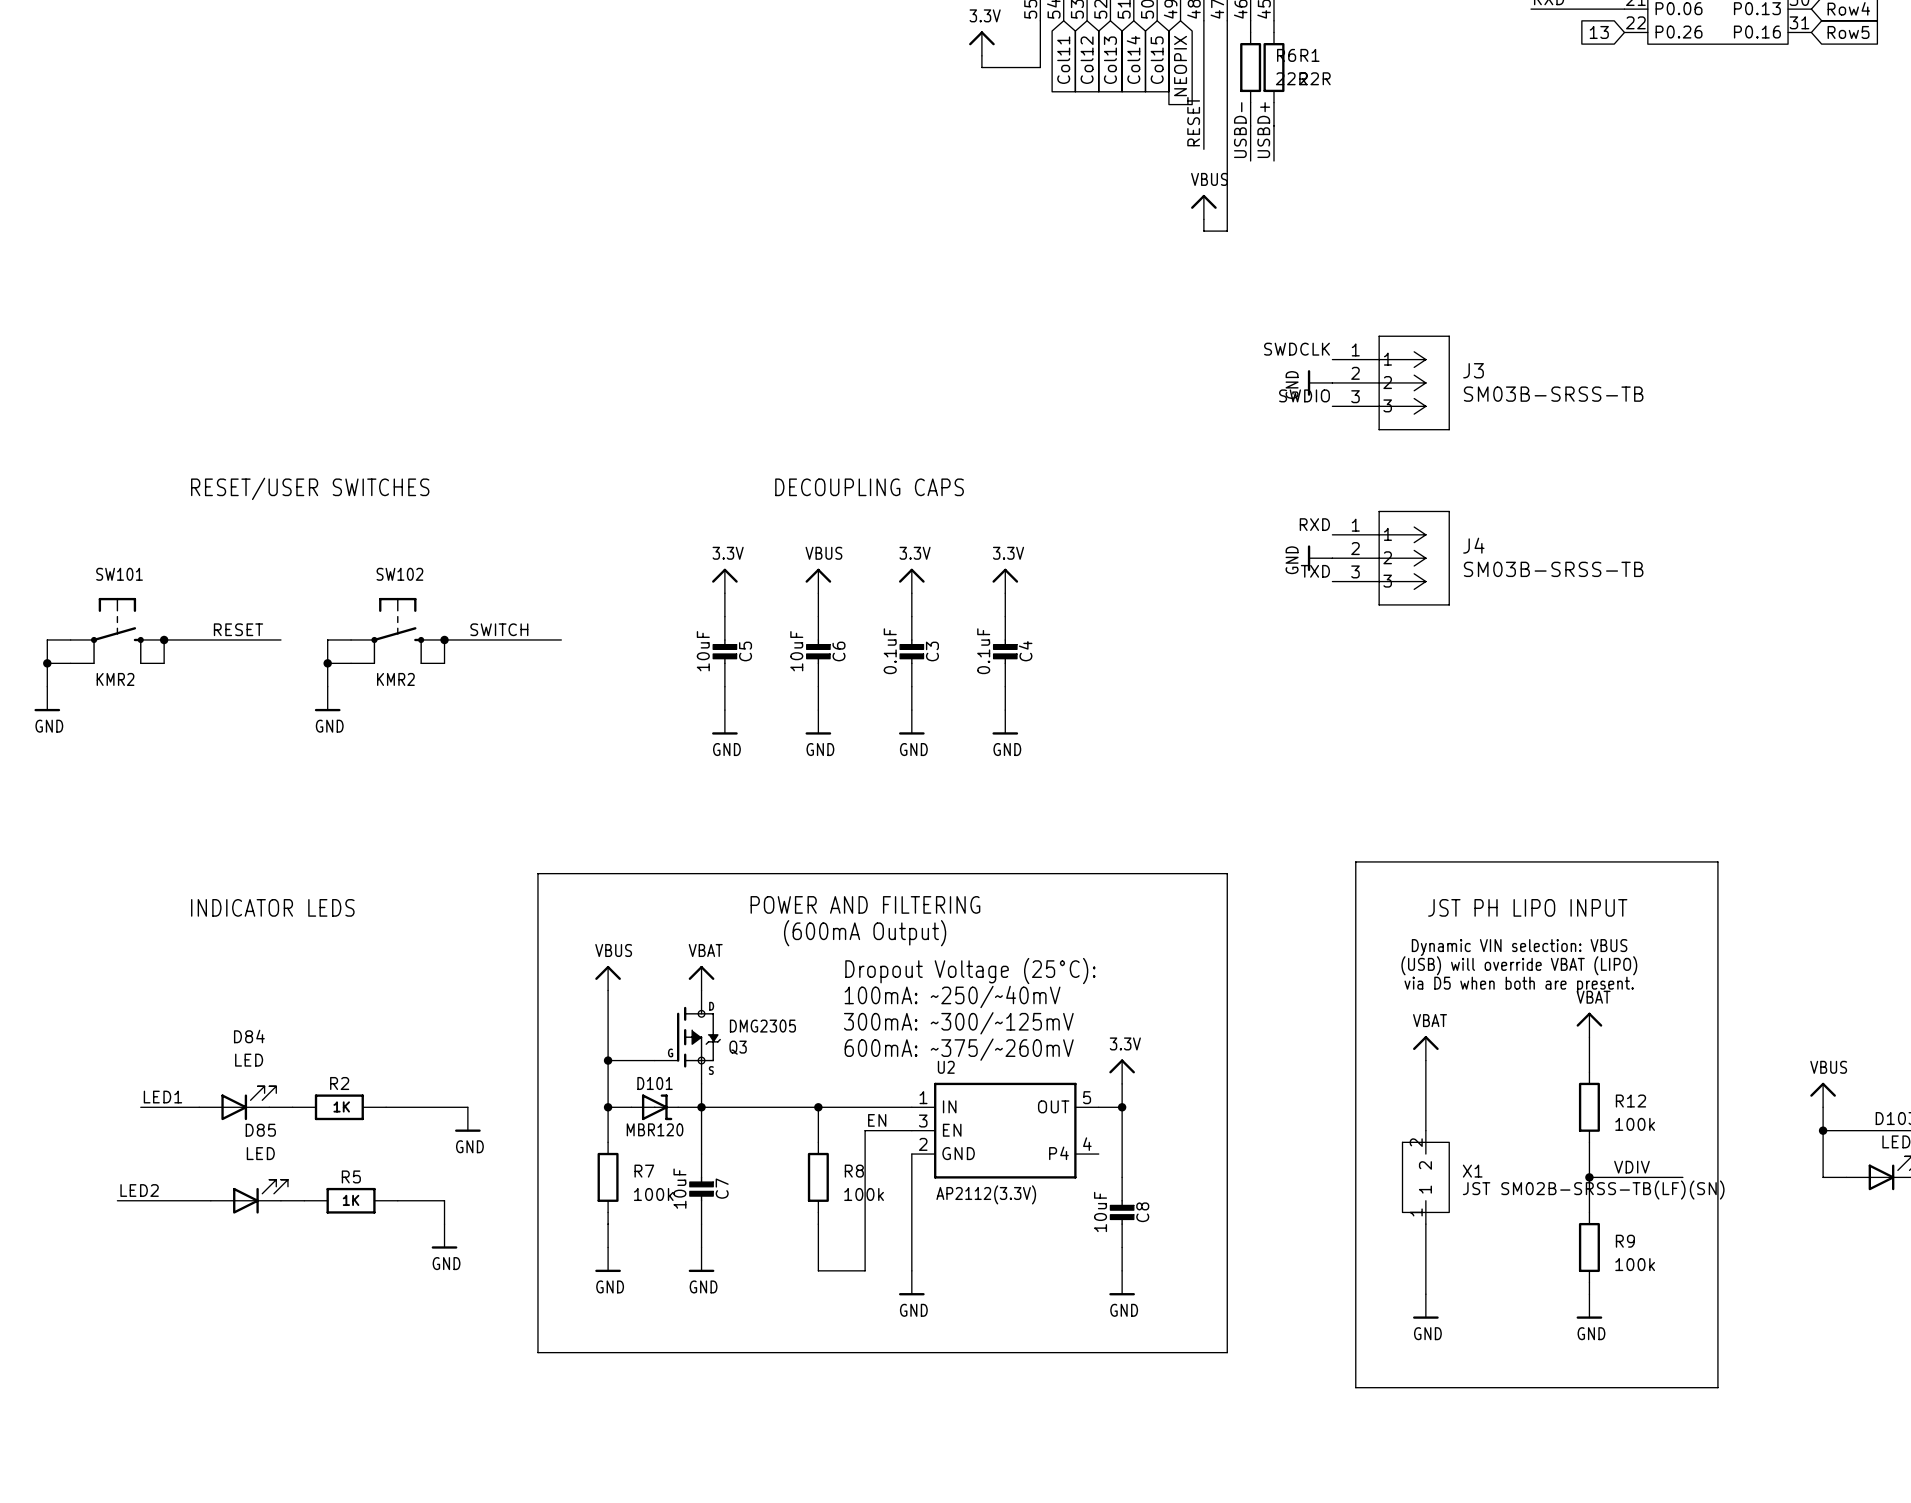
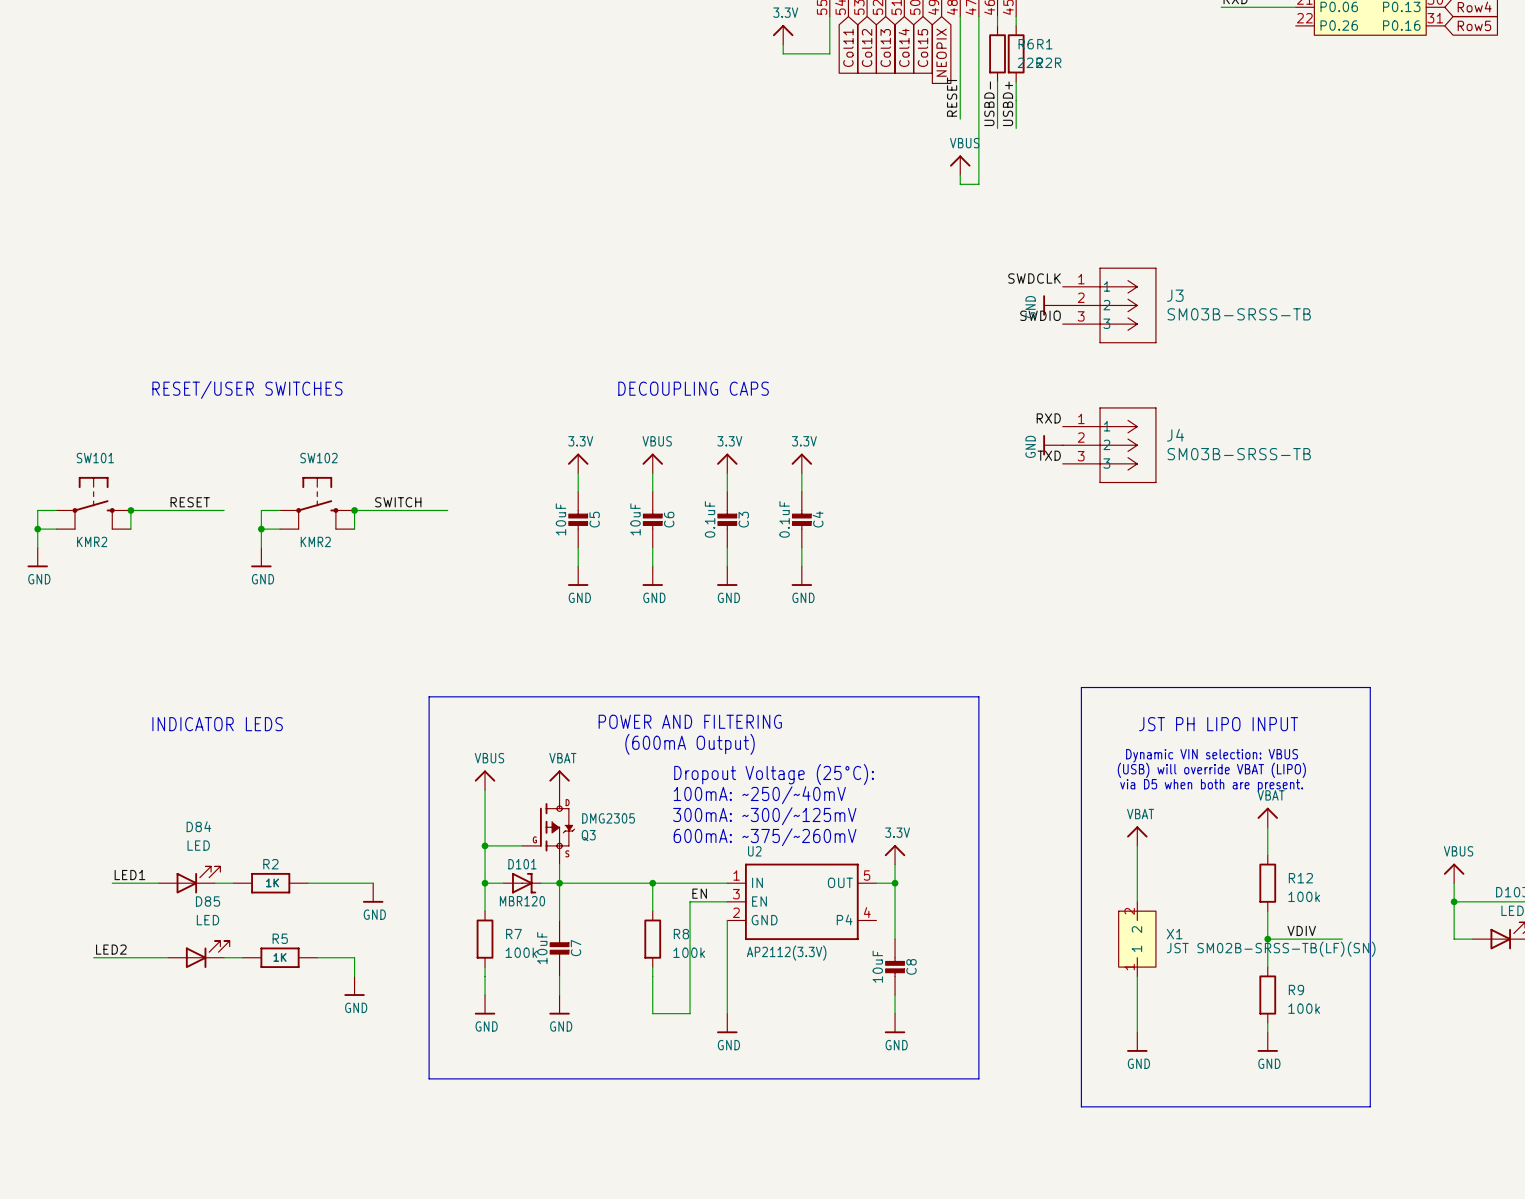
global label: 13 (1599, 32) -> none

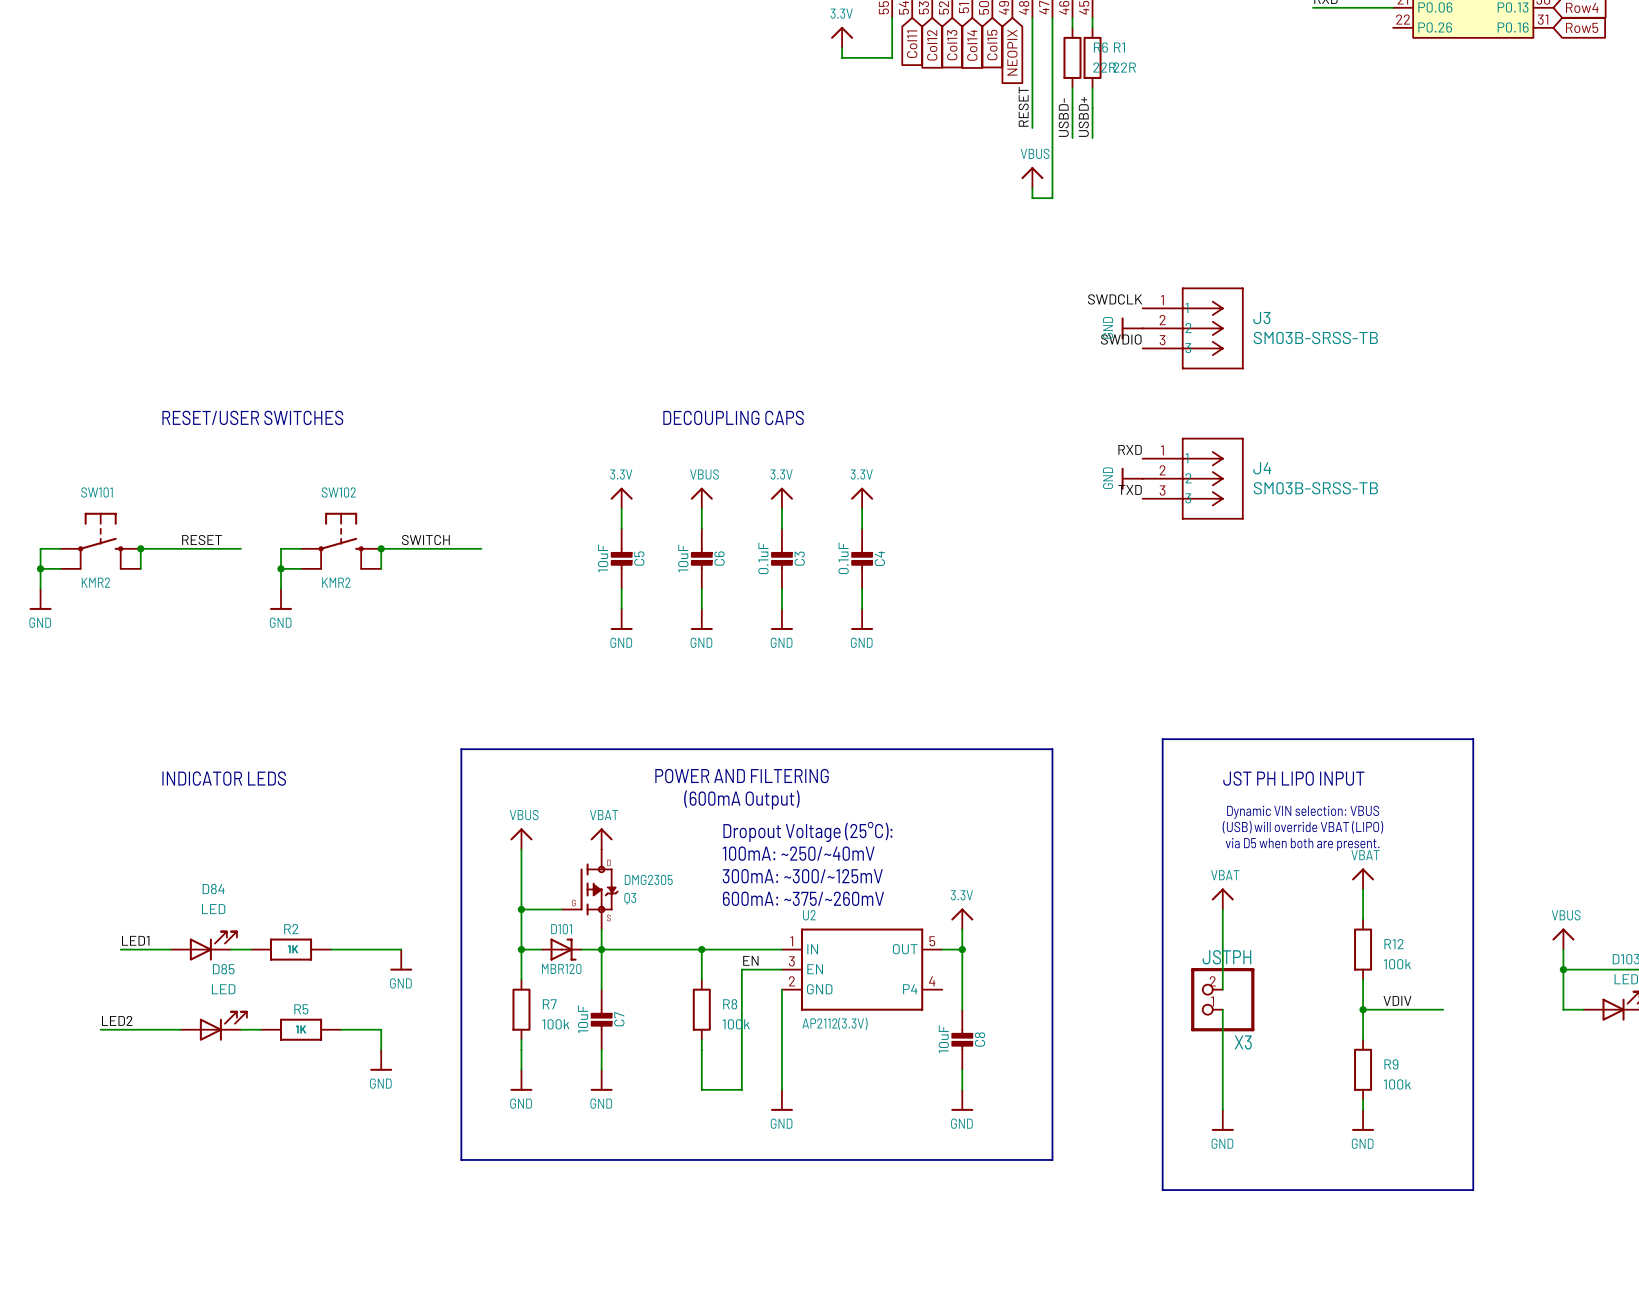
X3: none -> JSTPH (1222, 999)
X1: JST SM02B-SRSS-TB(LF)(SN) (1137, 939) -> none

